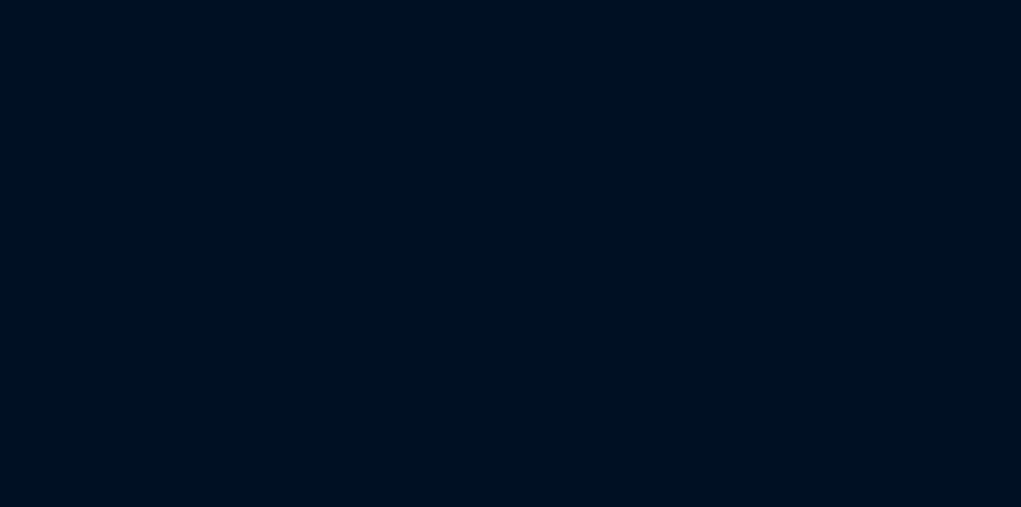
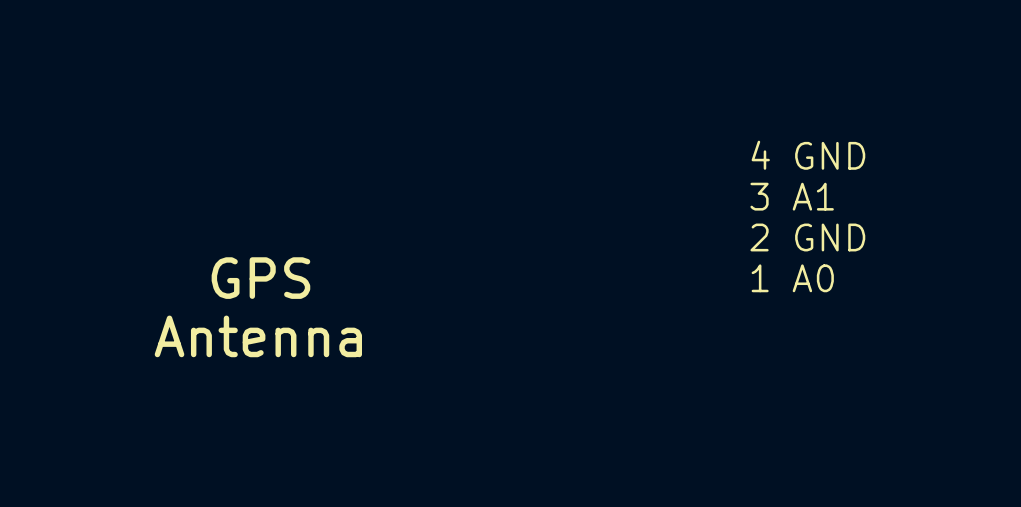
text: none -> 4 GND (808, 155)
text: none -> 3 A1 (792, 196)
text: none -> 2 GND (807, 237)
text: none -> GPS (260, 278)
text: none -> 1 A0 (792, 278)
text: none -> Antenna (258, 336)

